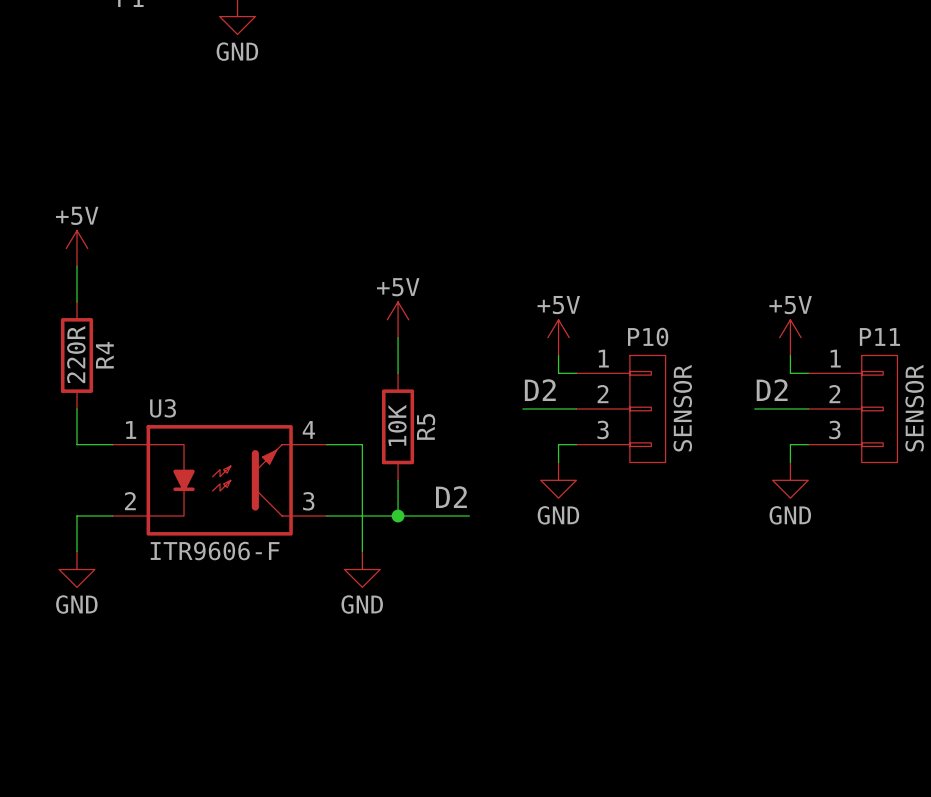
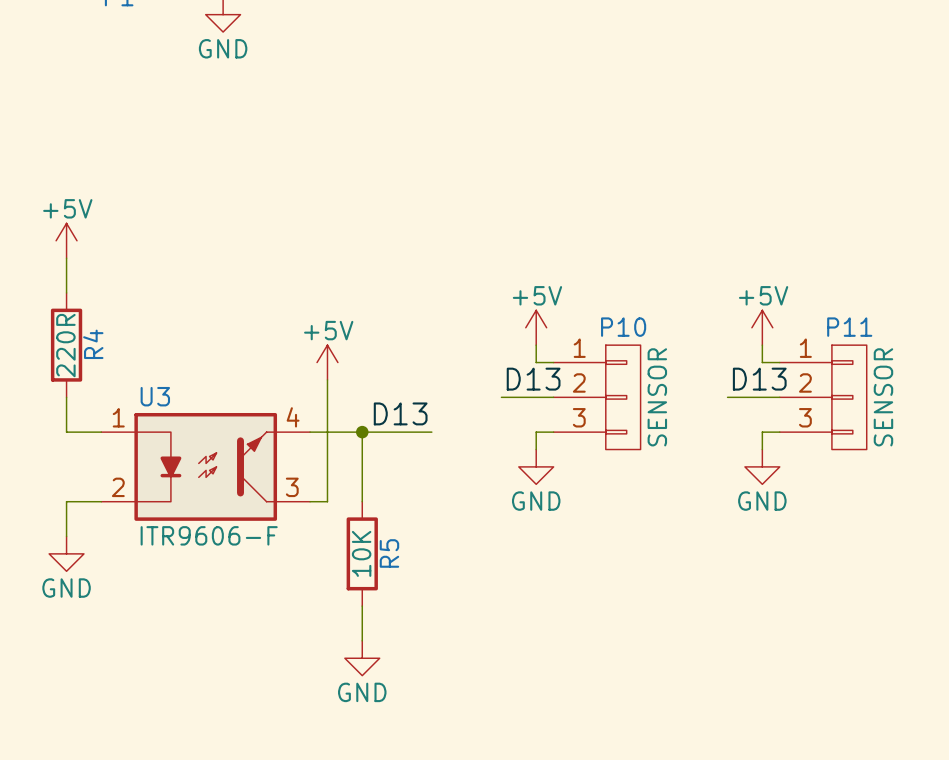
power symbol position: +5V (398, 319) -> +5V (327, 362)
wire: (398, 337) (398, 373) -> none
label: D2 (540, 390) -> D13 (533, 379)
label: D2 (772, 390) -> D13 (759, 379)
R5 position: (398, 426) -> (362, 553)
label: none -> D13 (400, 413)
wire: (362, 444) (362, 551) -> (344, 432) (431, 432)
wire: none -> (362, 432) (362, 501)
wire: (398, 480) (398, 516) -> (362, 606) (362, 640)
label: D2 (451, 497) -> none
wire: (344, 516) (469, 516) -> (327, 501) (327, 379)
junction position: (398, 516) -> (362, 432)
power symbol position: GND (362, 569) -> GND (362, 658)

